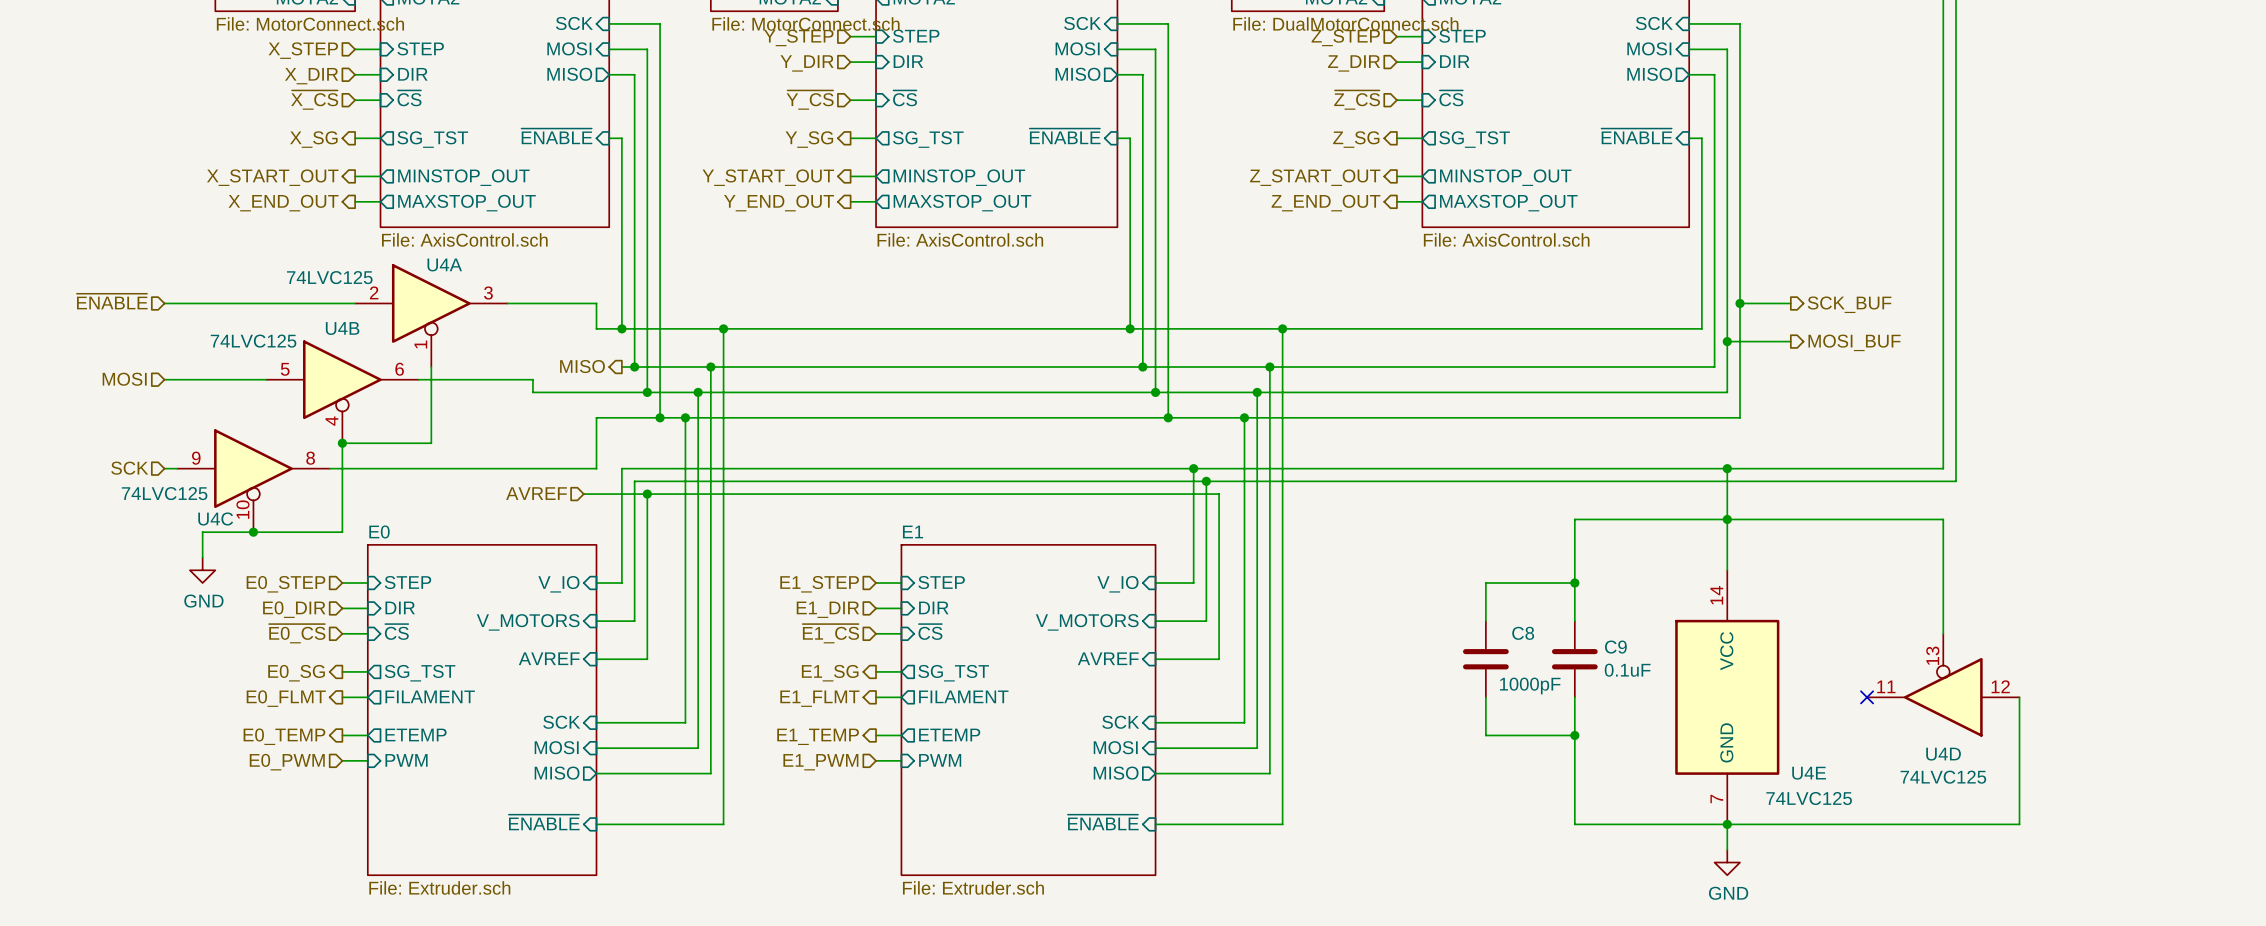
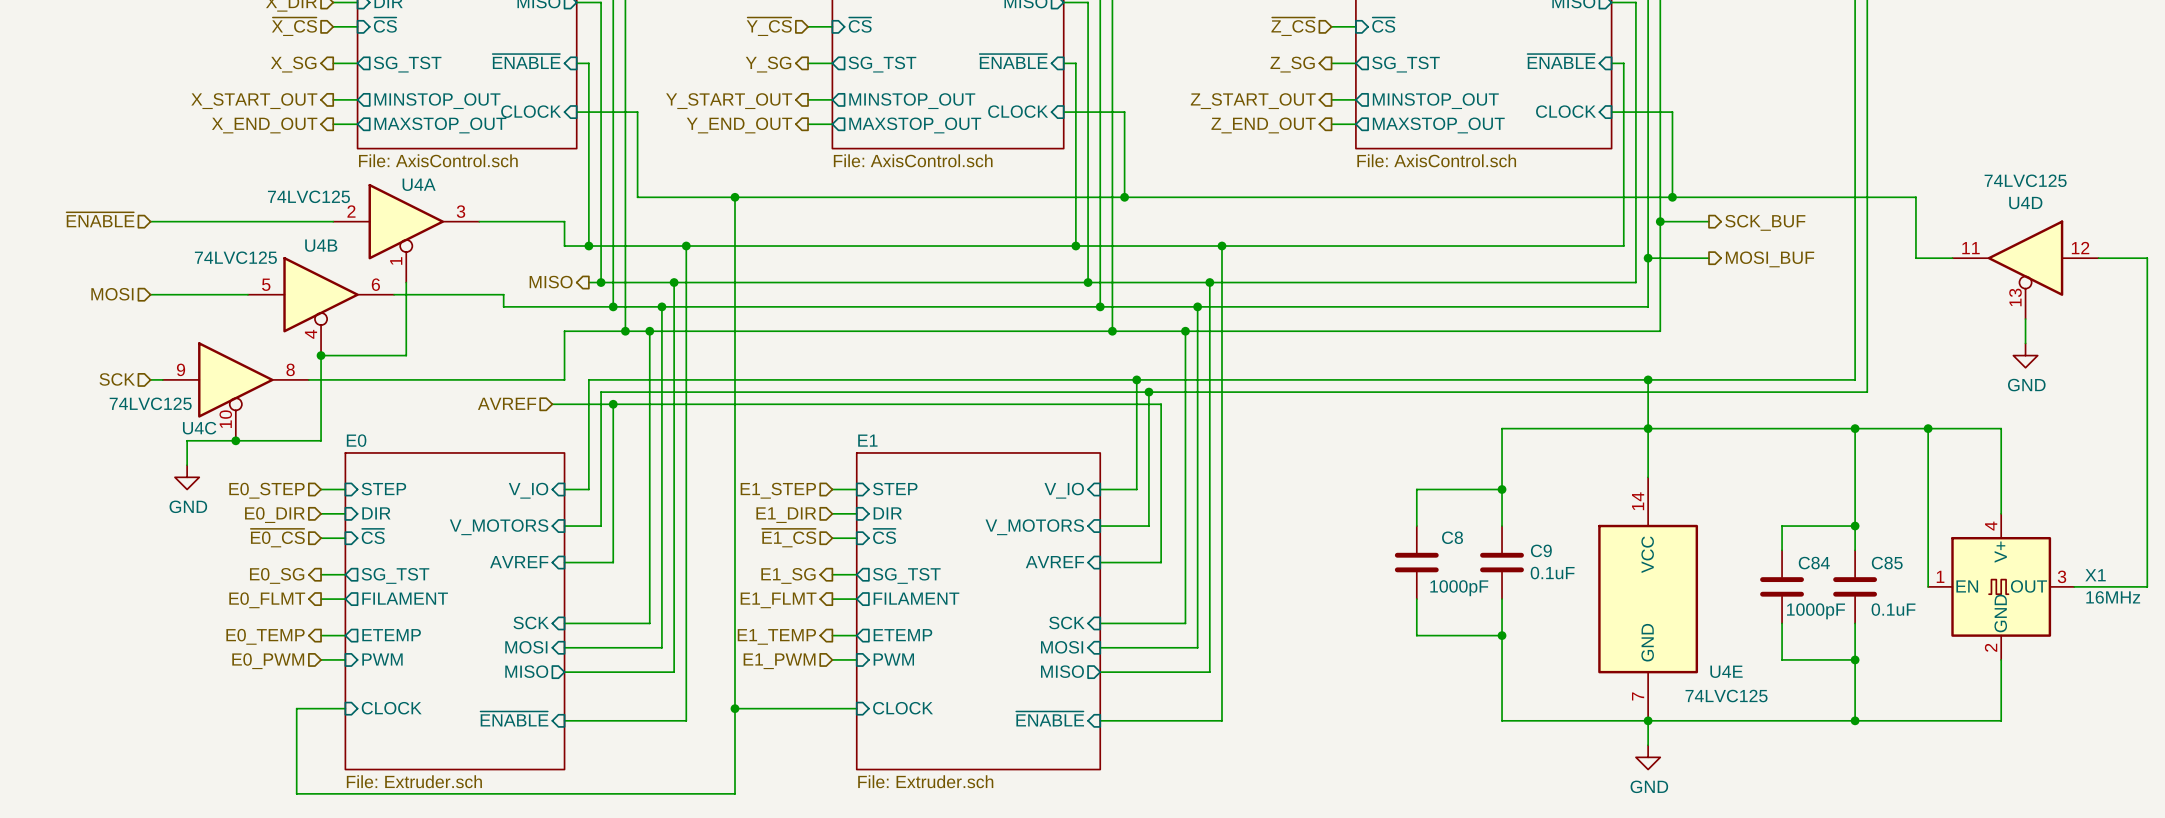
sheet pin: none -> CLOCK (531, 111)
sheet pin: none -> CLOCK (1018, 111)
sheet pin: none -> CLOCK (1565, 111)
wire: none -> (576, 112) (637, 112) (637, 197) (1915, 197) (1915, 258) (1952, 258)
wire: none -> (1063, 112) (1124, 112) (1124, 197)
wire: none -> (1611, 112) (1672, 112) (1672, 197)
wire: none -> (734, 197) (734, 793) (296, 793) (296, 708) (345, 708)
junction: none -> (734, 197)
junction: none -> (1124, 197)
junction: none -> (1672, 197)
wire: none -> (2098, 258) (2147, 258) (2147, 586) (2074, 586)
wire: none -> (2025, 319) (2025, 343)
power symbol: none -> GND (2025, 355)
wire: none -> (1855, 428) (2001, 428) (2001, 513)
junction: none -> (1855, 428)
wire: none -> (1928, 428) (1928, 586)
junction: none -> (1928, 428)
wire: none -> (1855, 526) (1782, 526) (1782, 550)
junction: none -> (1855, 526)
C84: none -> 1000pF (1782, 586)
C85: none -> 0.1uF (1855, 586)
X1: none -> 16MHz (2001, 586)
U4D position: (1943, 685) -> (2025, 269)
no-connect mark: (1867, 697) -> none
U4D flip: as is (1943, 697) -> up-down (2025, 258)
wire: (2019, 697) (2019, 824) -> (2001, 659) (2001, 720) (1928, 720)
wire: none -> (1782, 623) (1782, 659) (1855, 659)
wire: none -> (1855, 623) (1855, 720)
junction: none -> (1855, 659)
sheet pin: none -> CLOCK (391, 708)
wire: none -> (734, 708) (856, 708)
junction: none -> (734, 708)
sheet pin: none -> CLOCK (903, 708)
junction: none -> (1855, 720)

